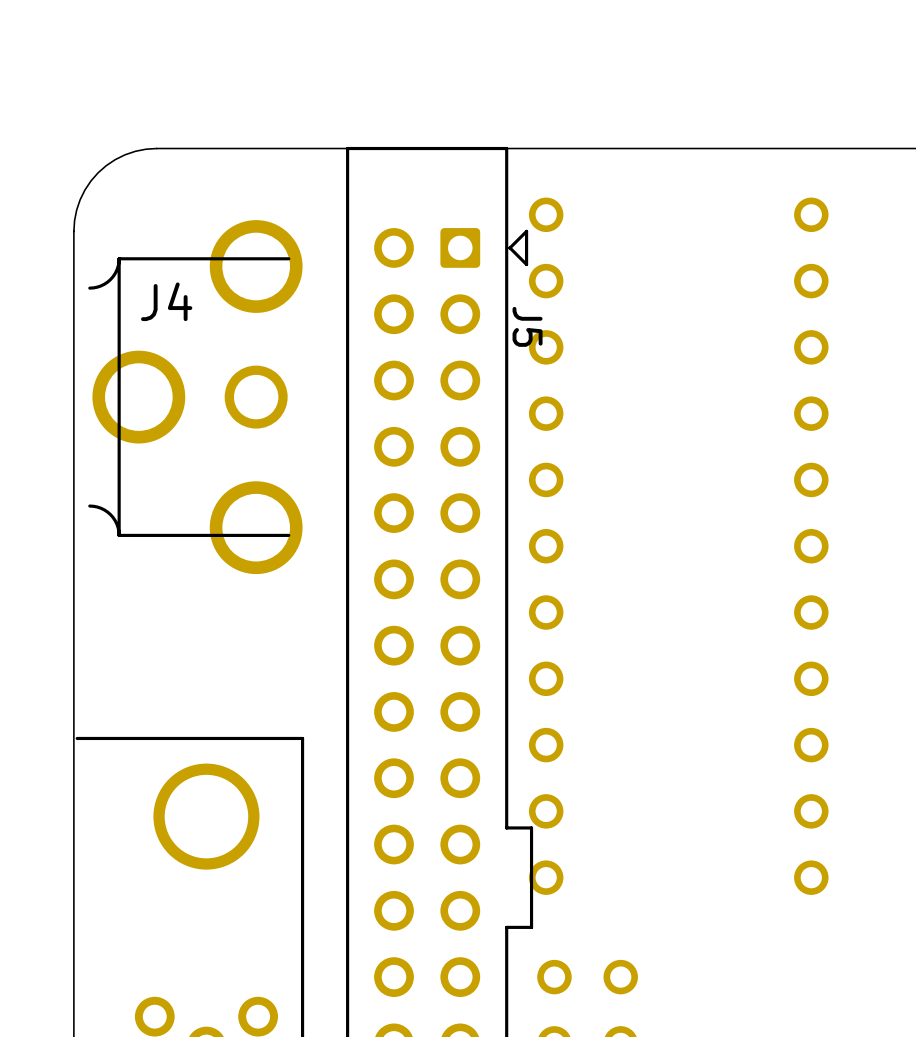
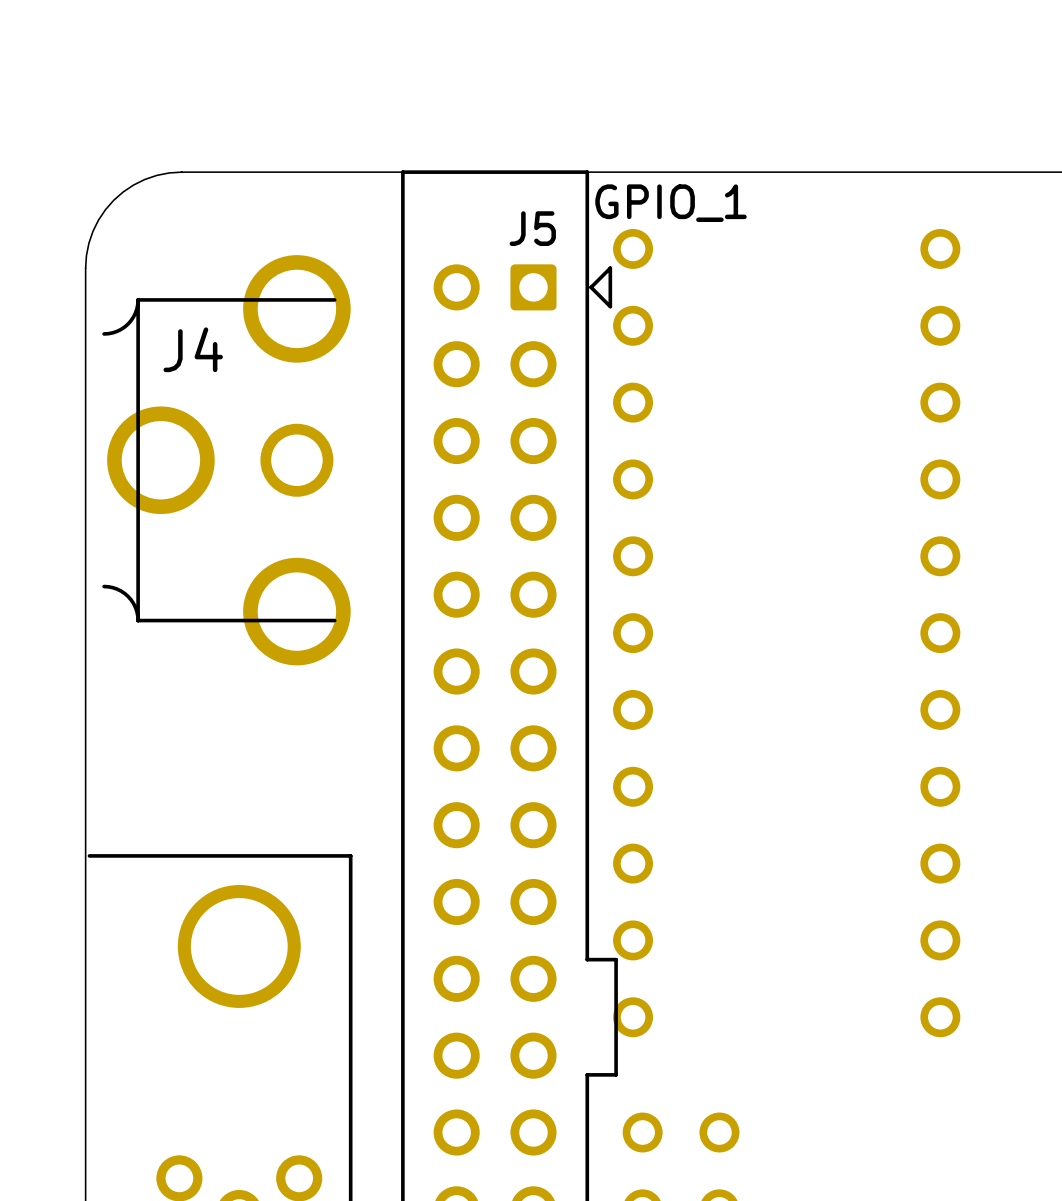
J5 value: none -> GPIO_1 (671, 203)
J5 name rotation: 0° (527, 326) -> 90° counterclockwise (532, 228)
J5 name position: J5 (527, 326) -> J5 (532, 228)

